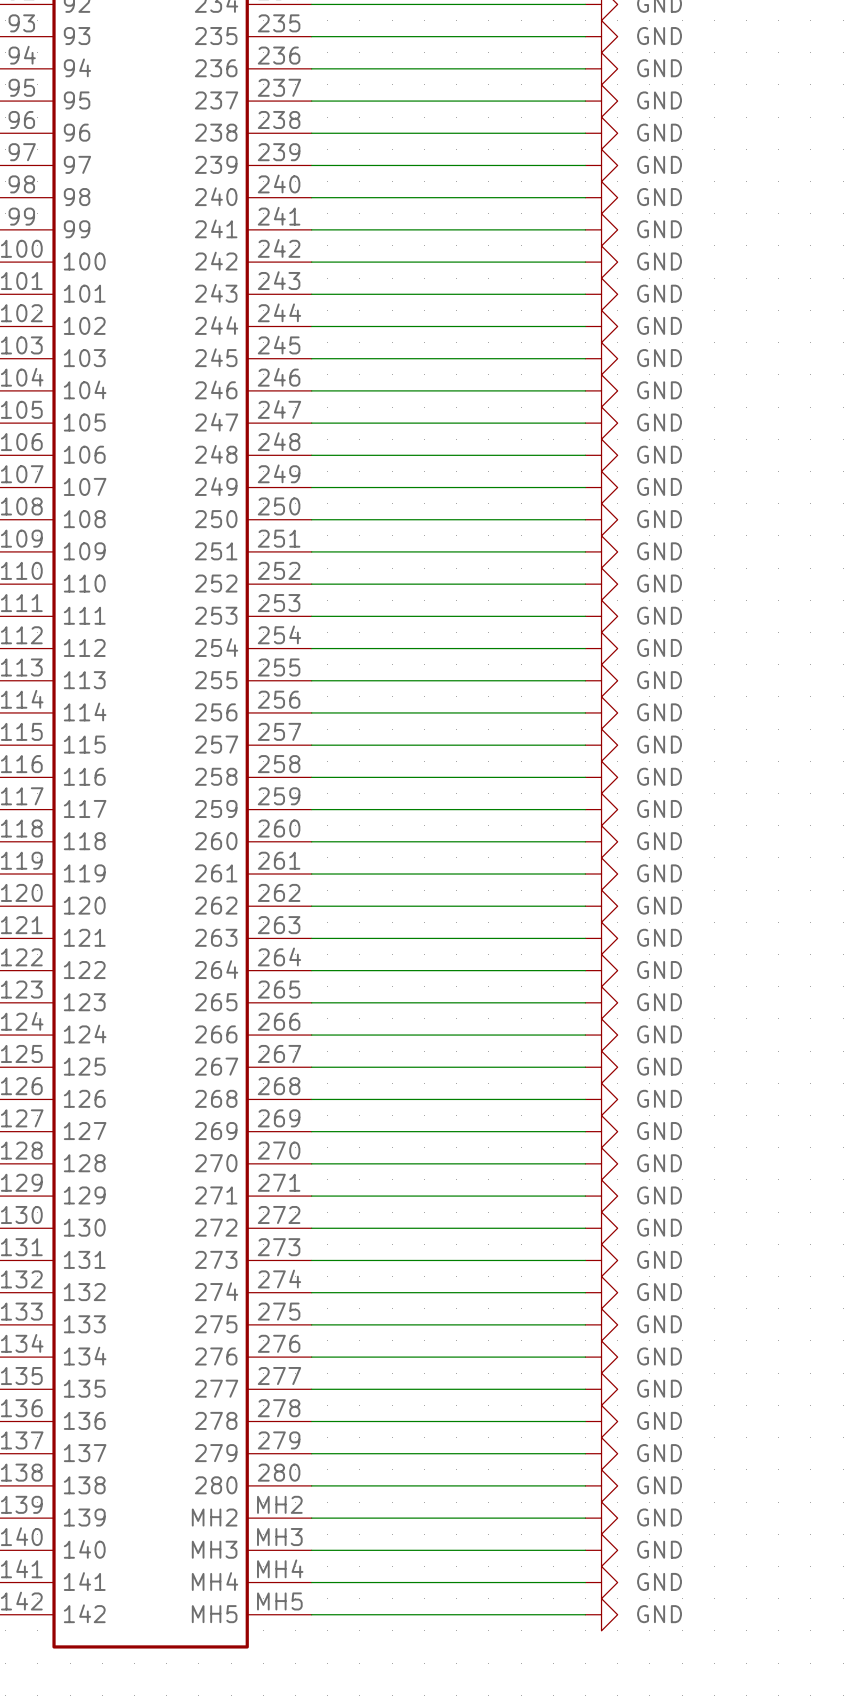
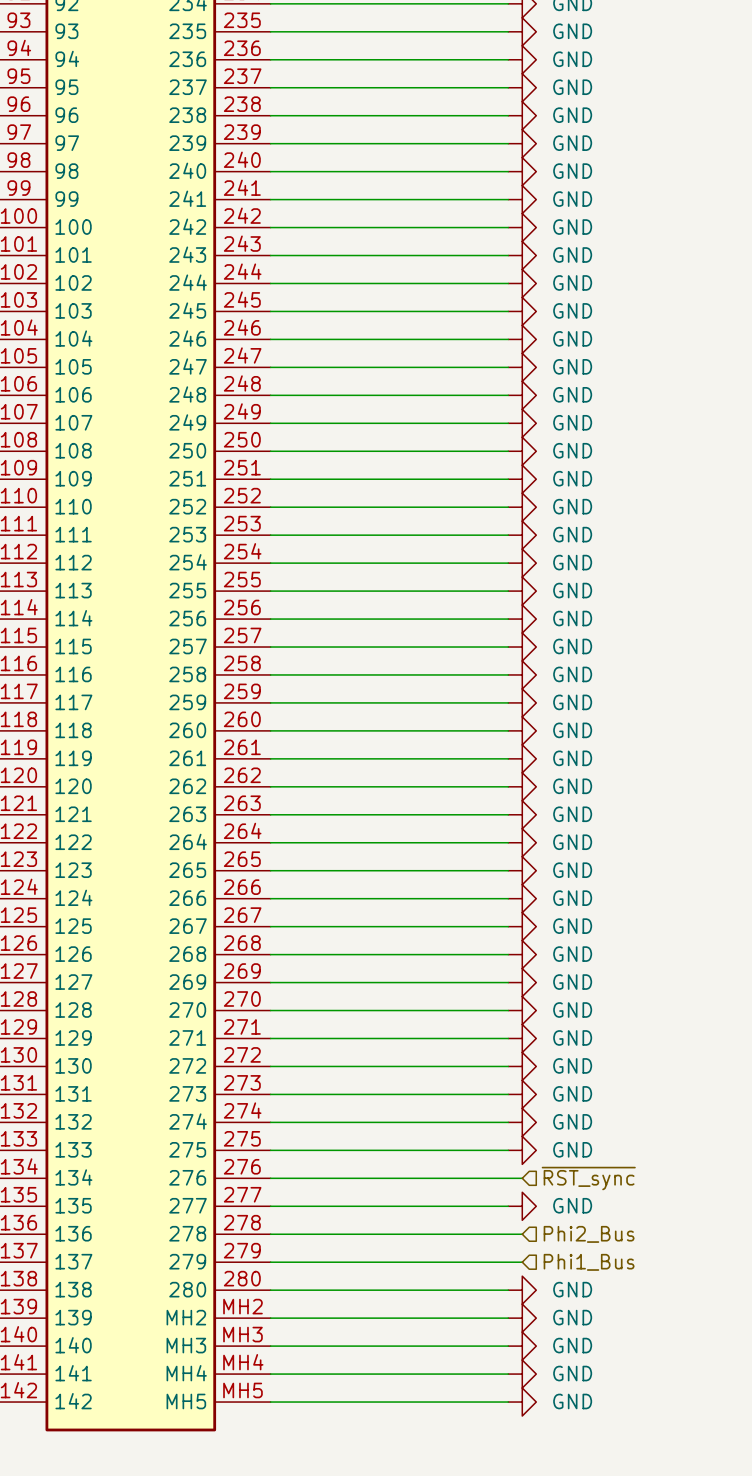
power symbol: GND (601, 1357) -> none
hierarchical label: none -> ~{RST_sync} (588, 1178)
power symbol: GND (601, 1421) -> none
hierarchical label: none -> Phi2_Bus (589, 1234)
power symbol: GND (601, 1453) -> none
hierarchical label: none -> Phi1_Bus (589, 1262)

